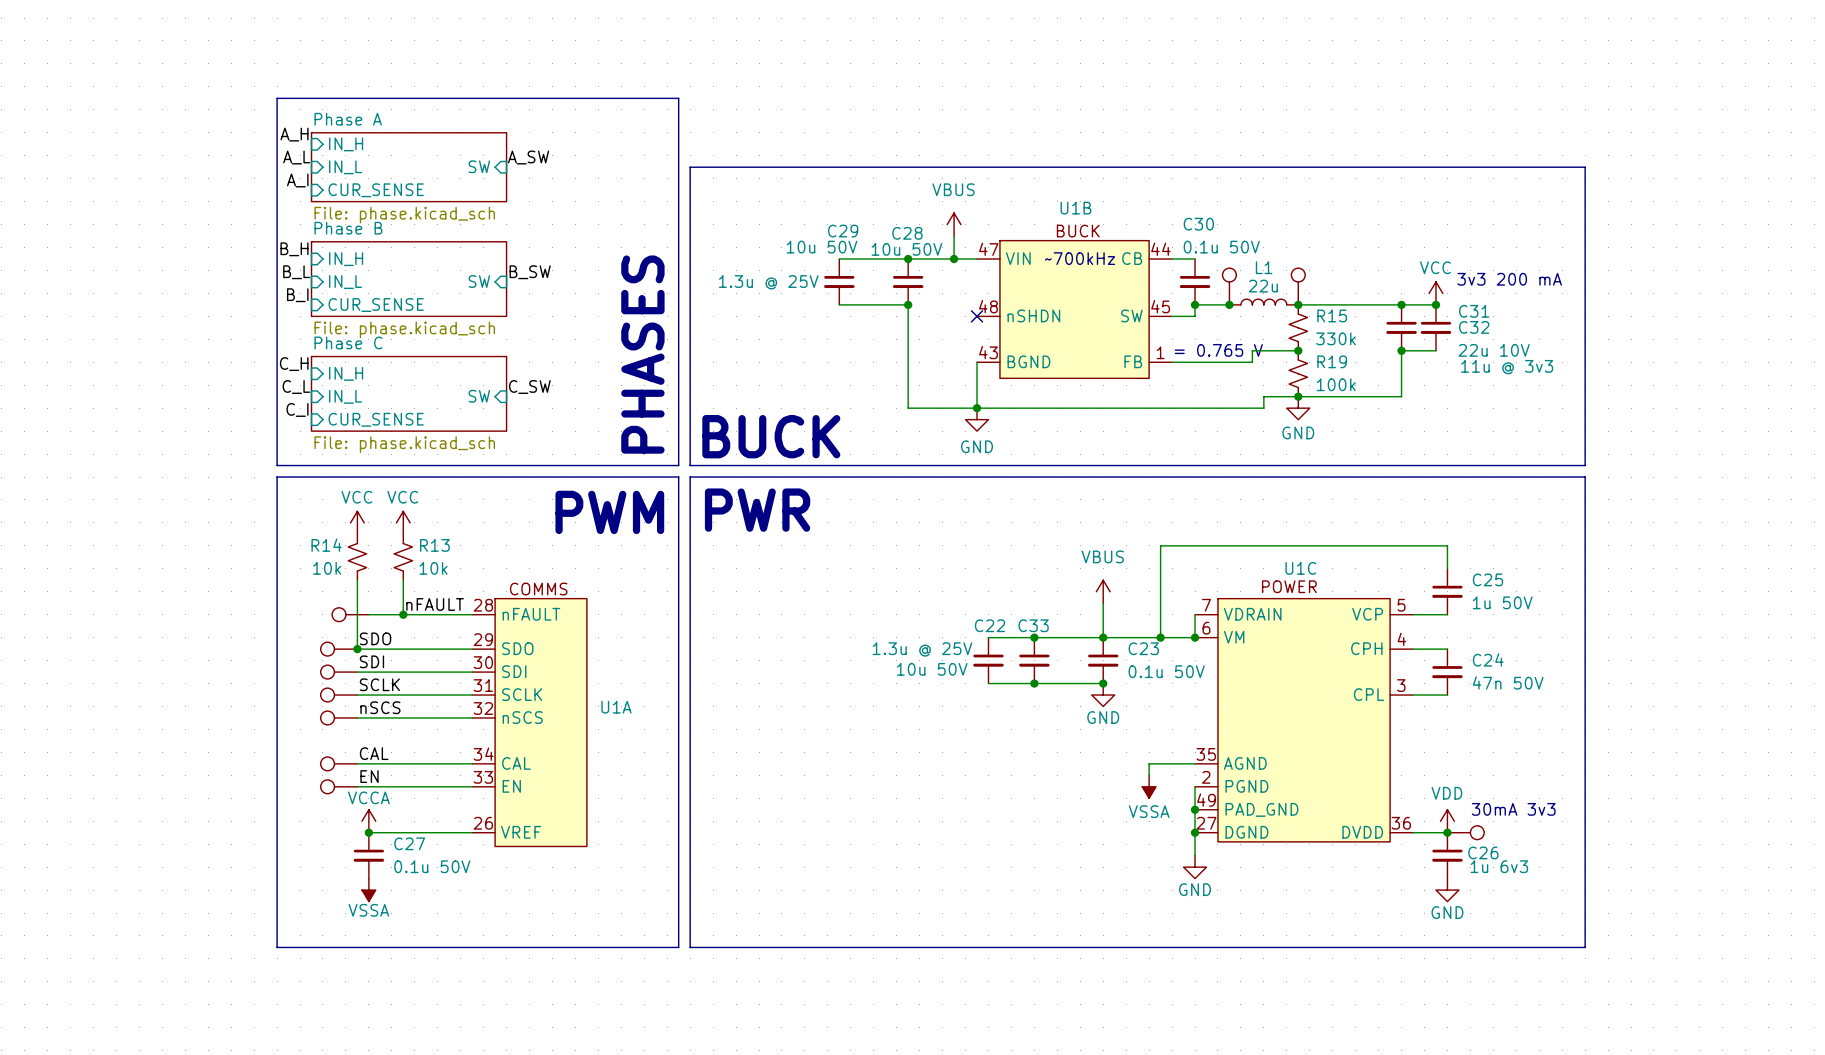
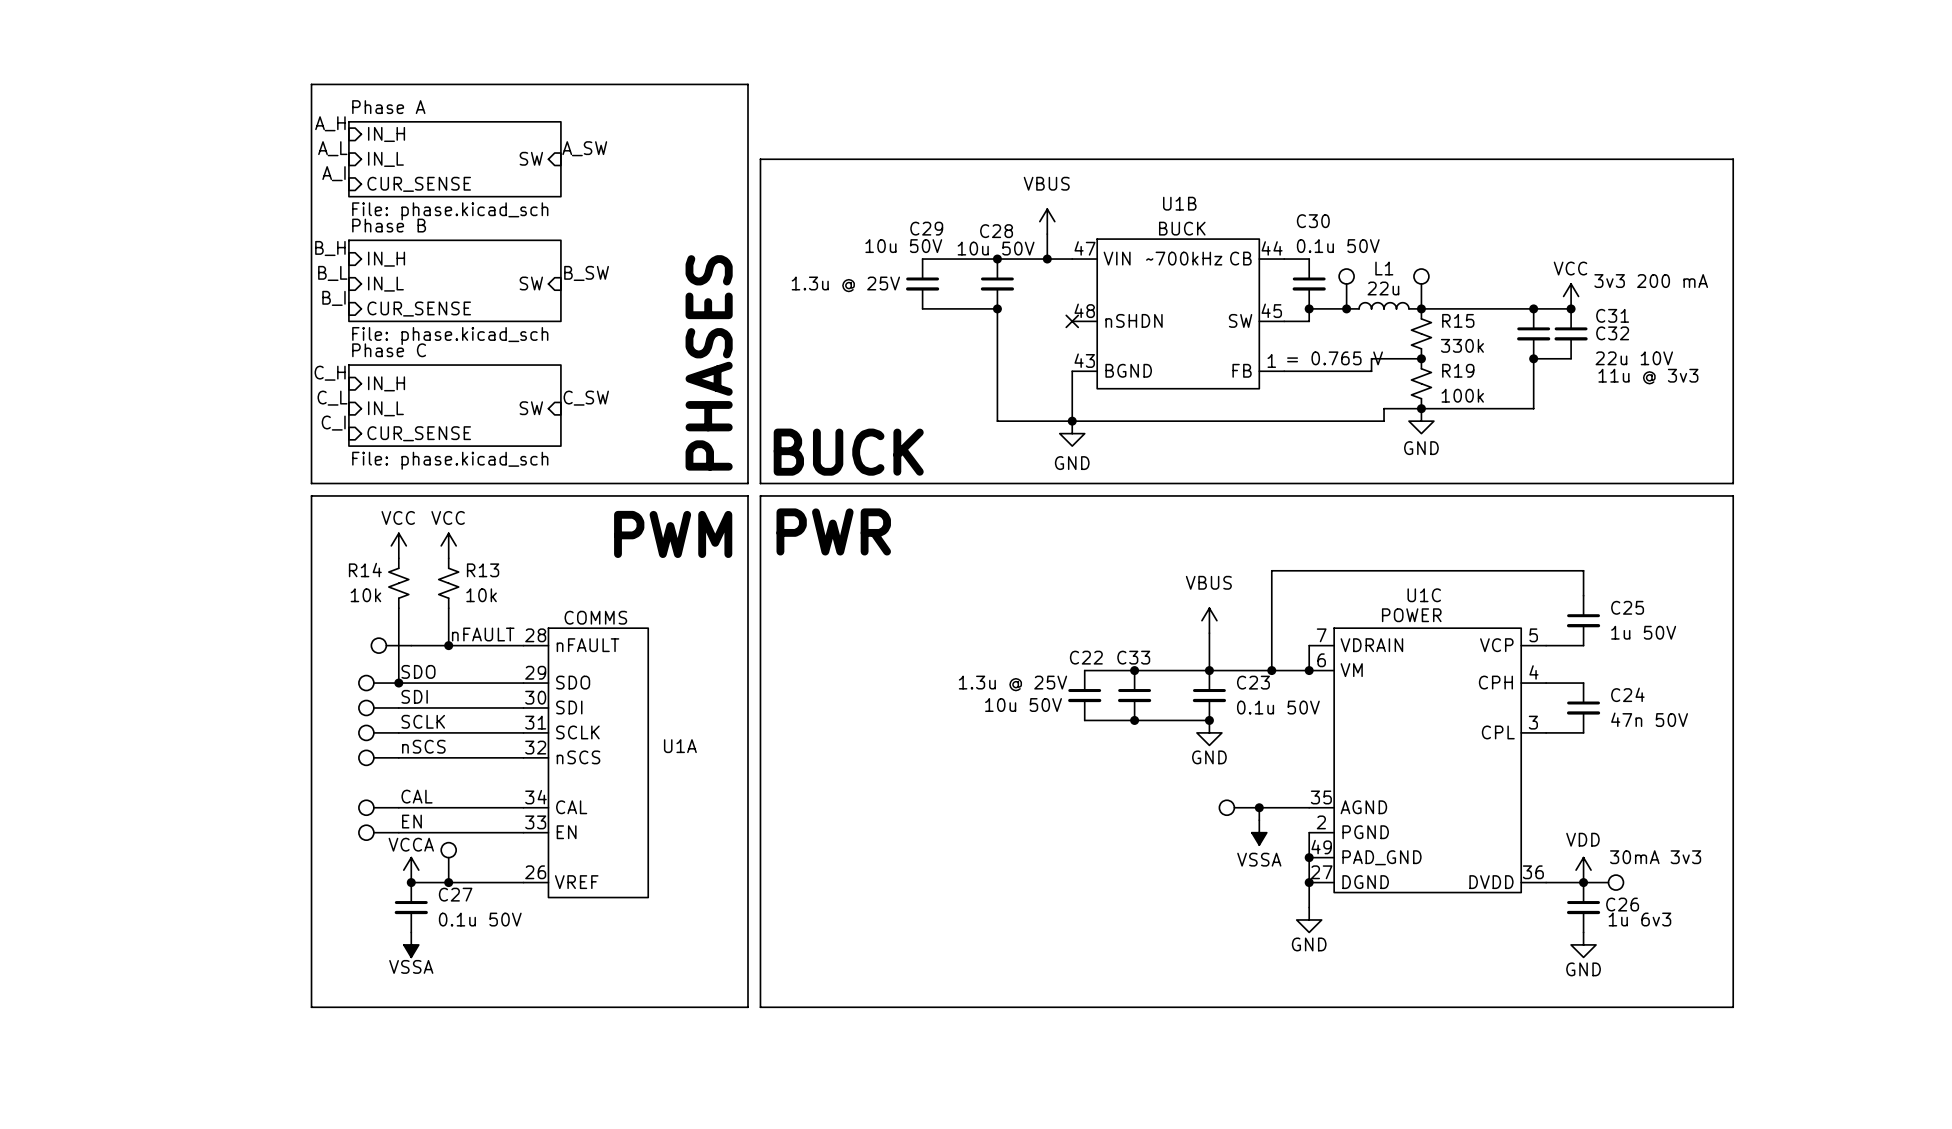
part: none -> (1239, 807)
junction: none -> (1259, 807)
part: none -> (448, 862)
junction: none -> (448, 882)

